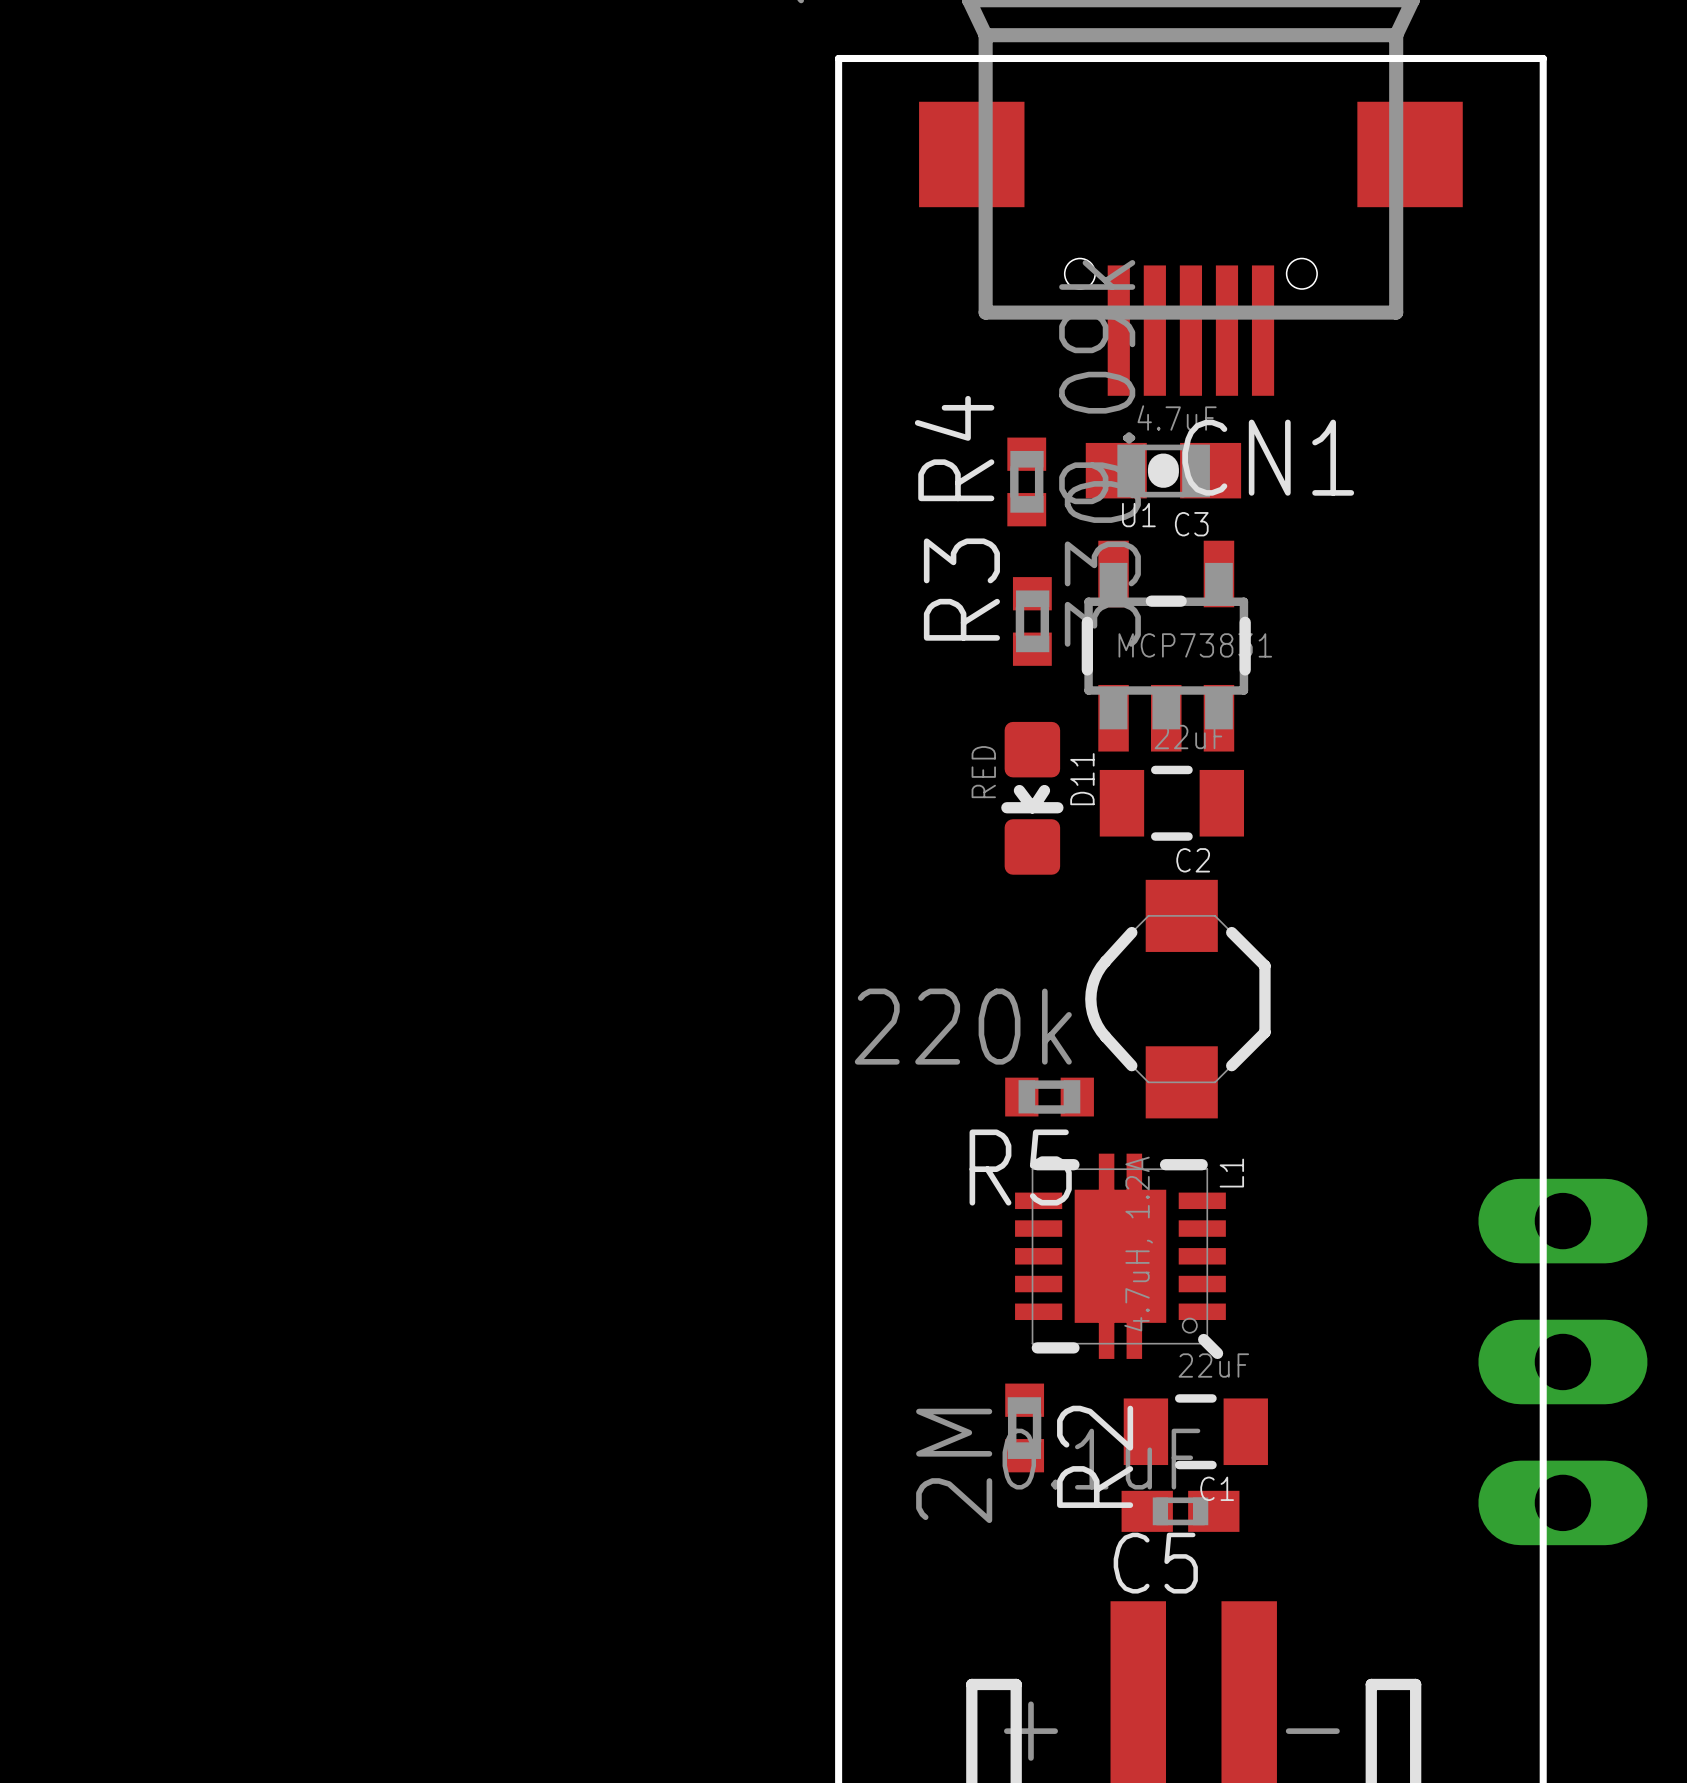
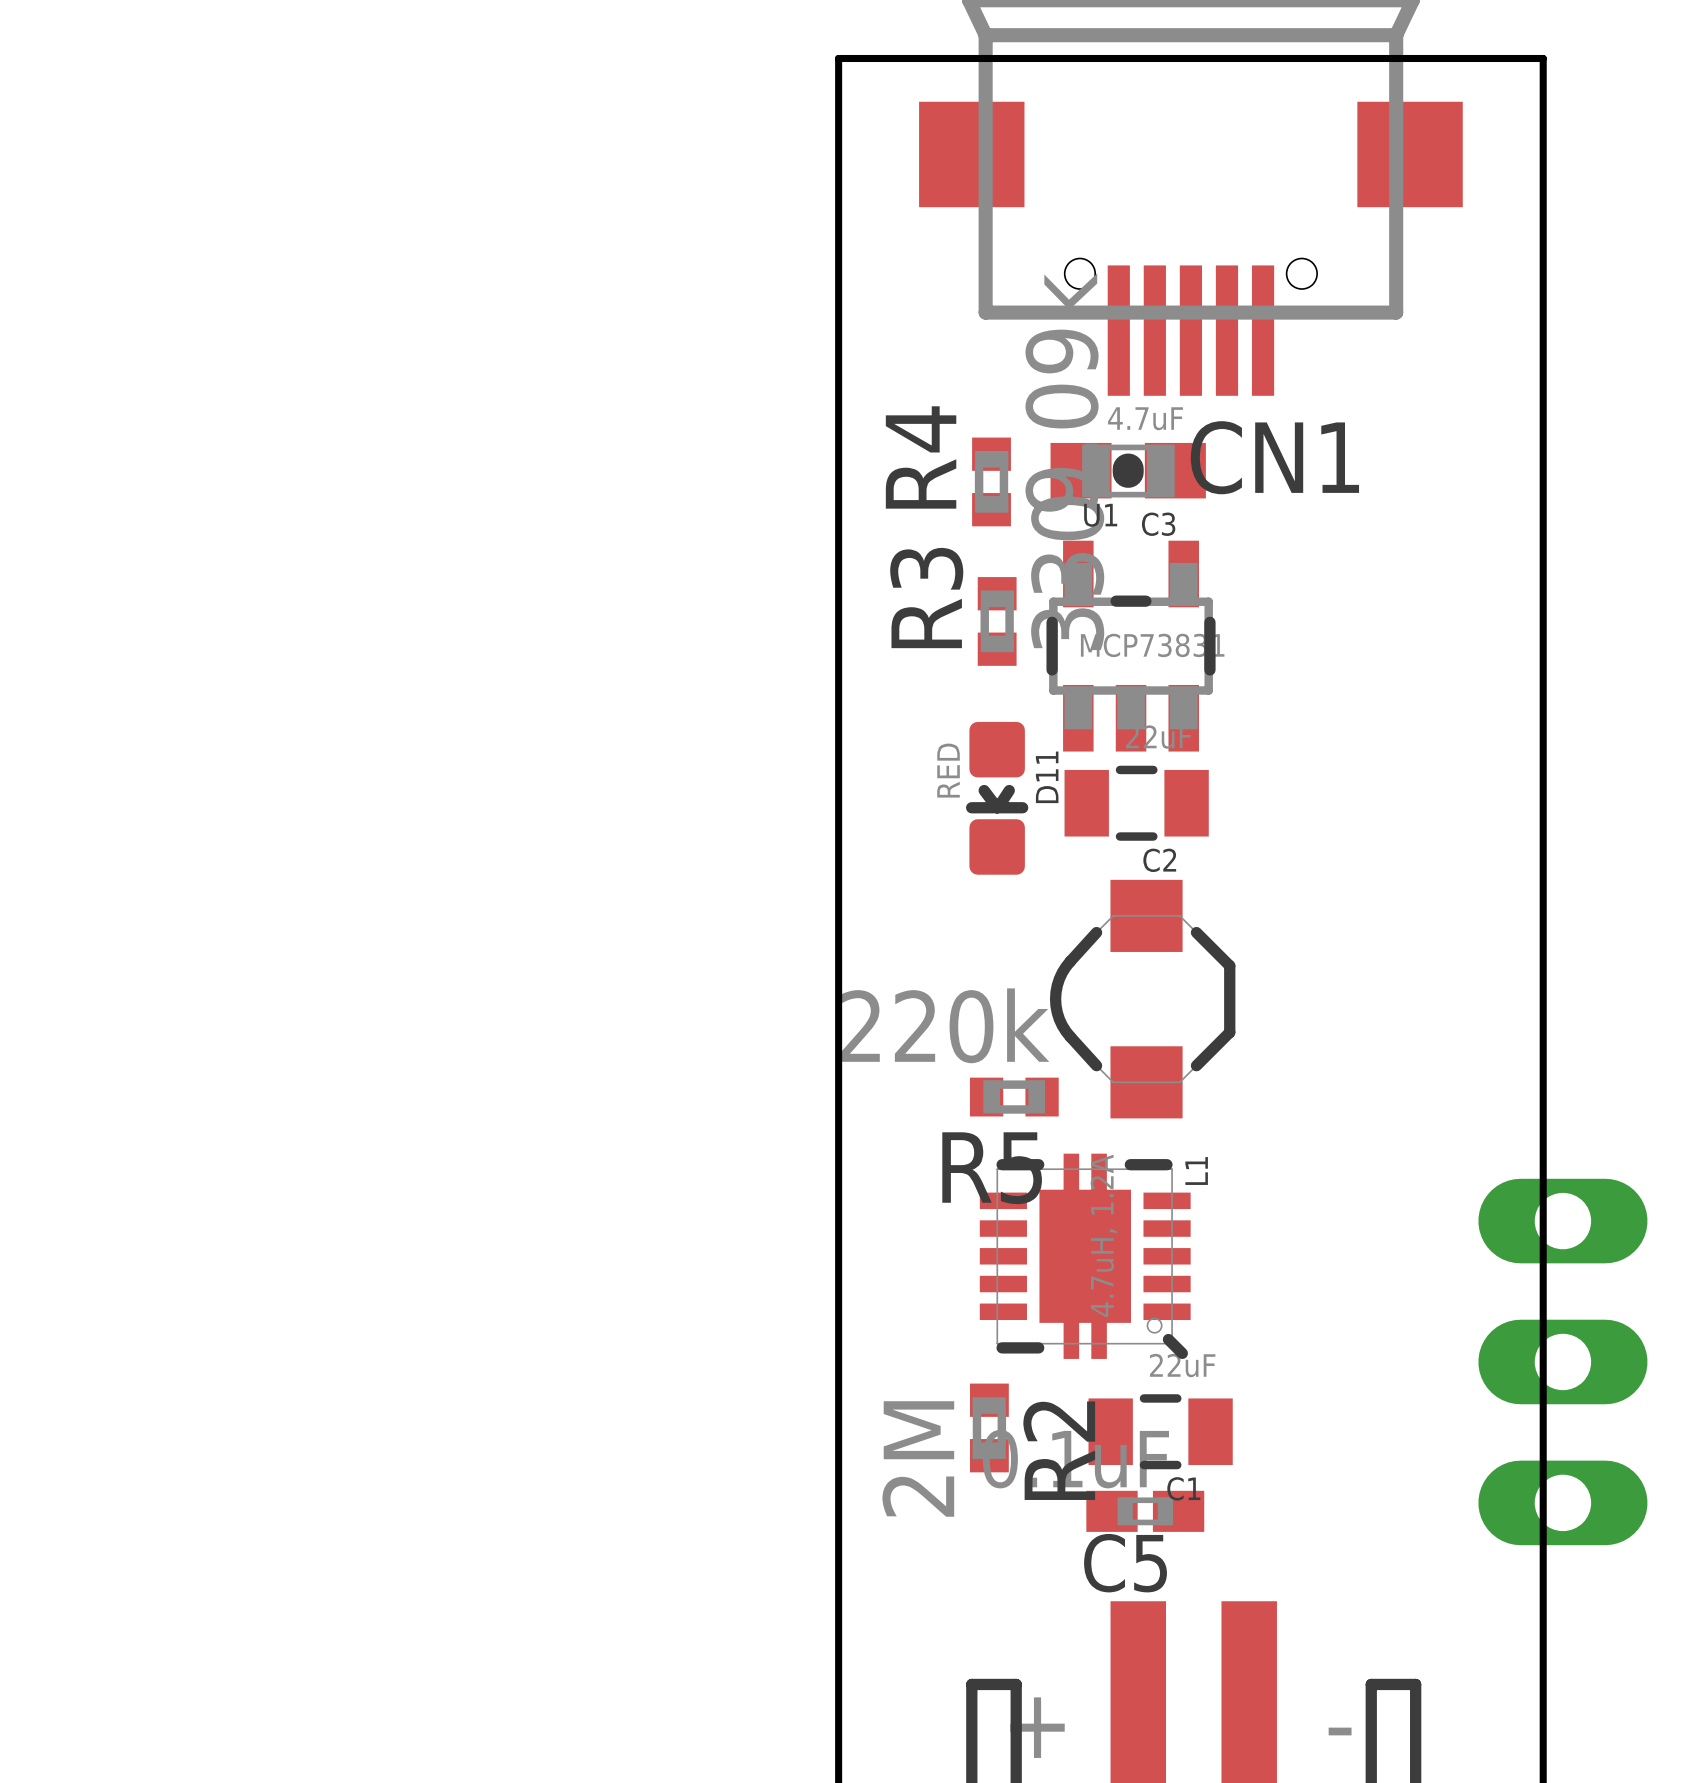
C3 position: (1163, 470) -> (1128, 470)
R4 position: (1026, 481) -> (991, 481)
R3 position: (1032, 621) -> (997, 621)
U1 position: (1166, 646) -> (1131, 646)
D11 position: (1032, 798) -> (997, 798)
C2 position: (1171, 803) -> (1136, 803)
L1 position: (1177, 999) -> (1142, 999)
R5 position: (1049, 1097) -> (1014, 1097)
part position: (1120, 1256) -> (1085, 1256)
R2 position: (1024, 1427) -> (989, 1427)
C1 position: (1195, 1431) -> (1160, 1431)
C5 position: (1180, 1511) -> (1145, 1511)

